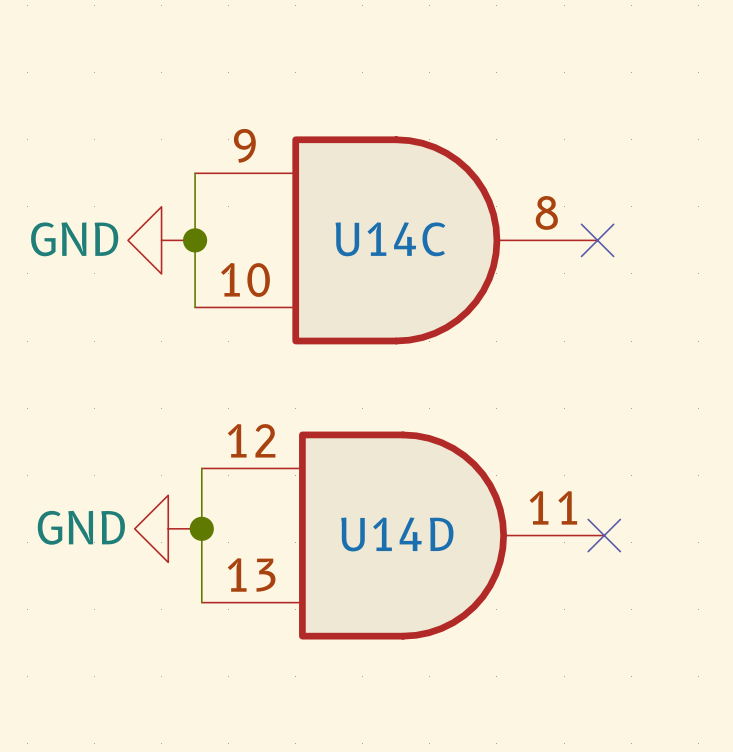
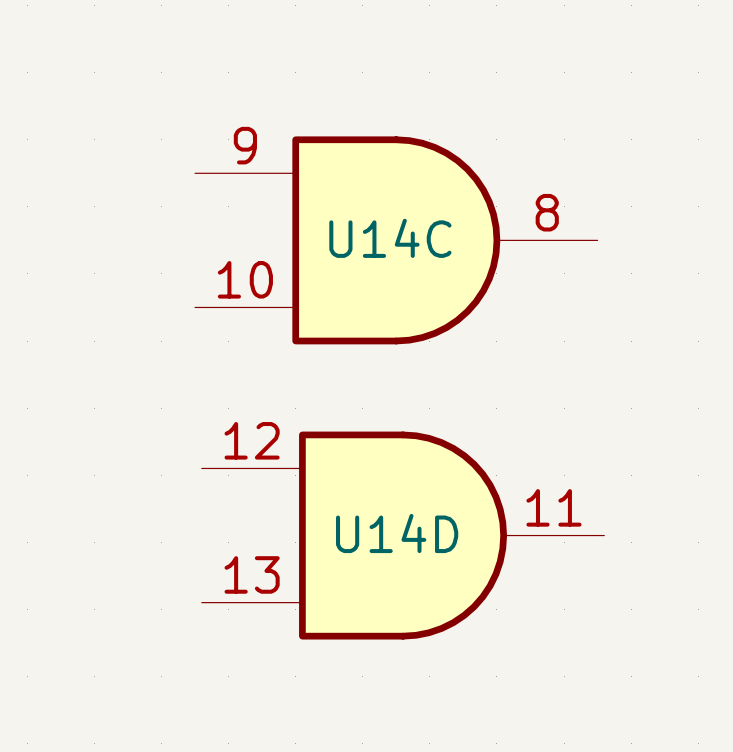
wire: (195, 173) (195, 307) -> none
power symbol: GND (161, 240) -> none
junction: (195, 240) -> none
no-connect mark: (597, 240) -> none
wire: (201, 468) (201, 602) -> none
power symbol: GND (168, 528) -> none
junction: (201, 528) -> none
no-connect mark: (604, 535) -> none

